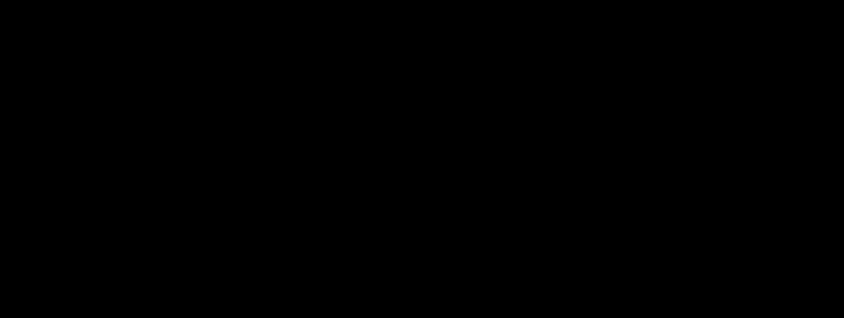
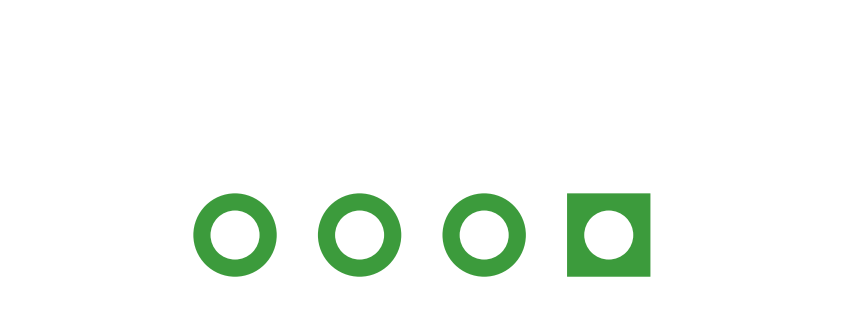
part: none -> (421, 235)

